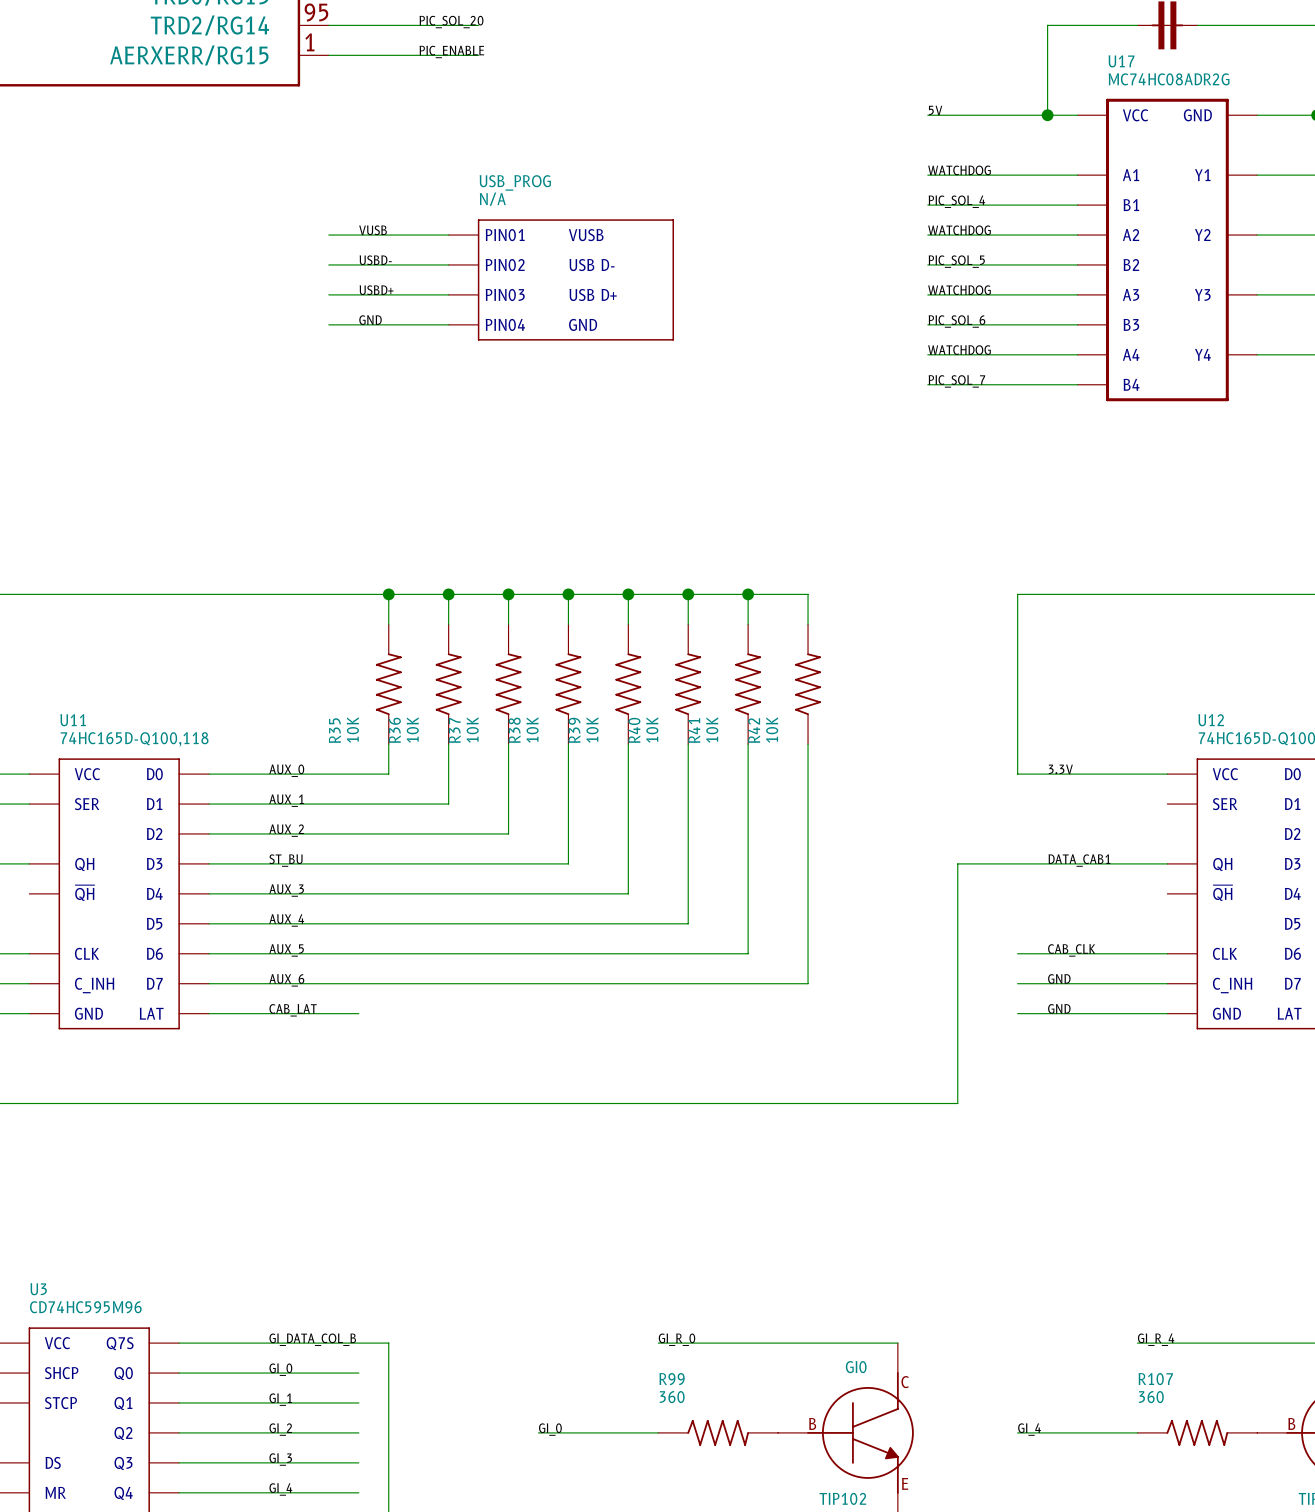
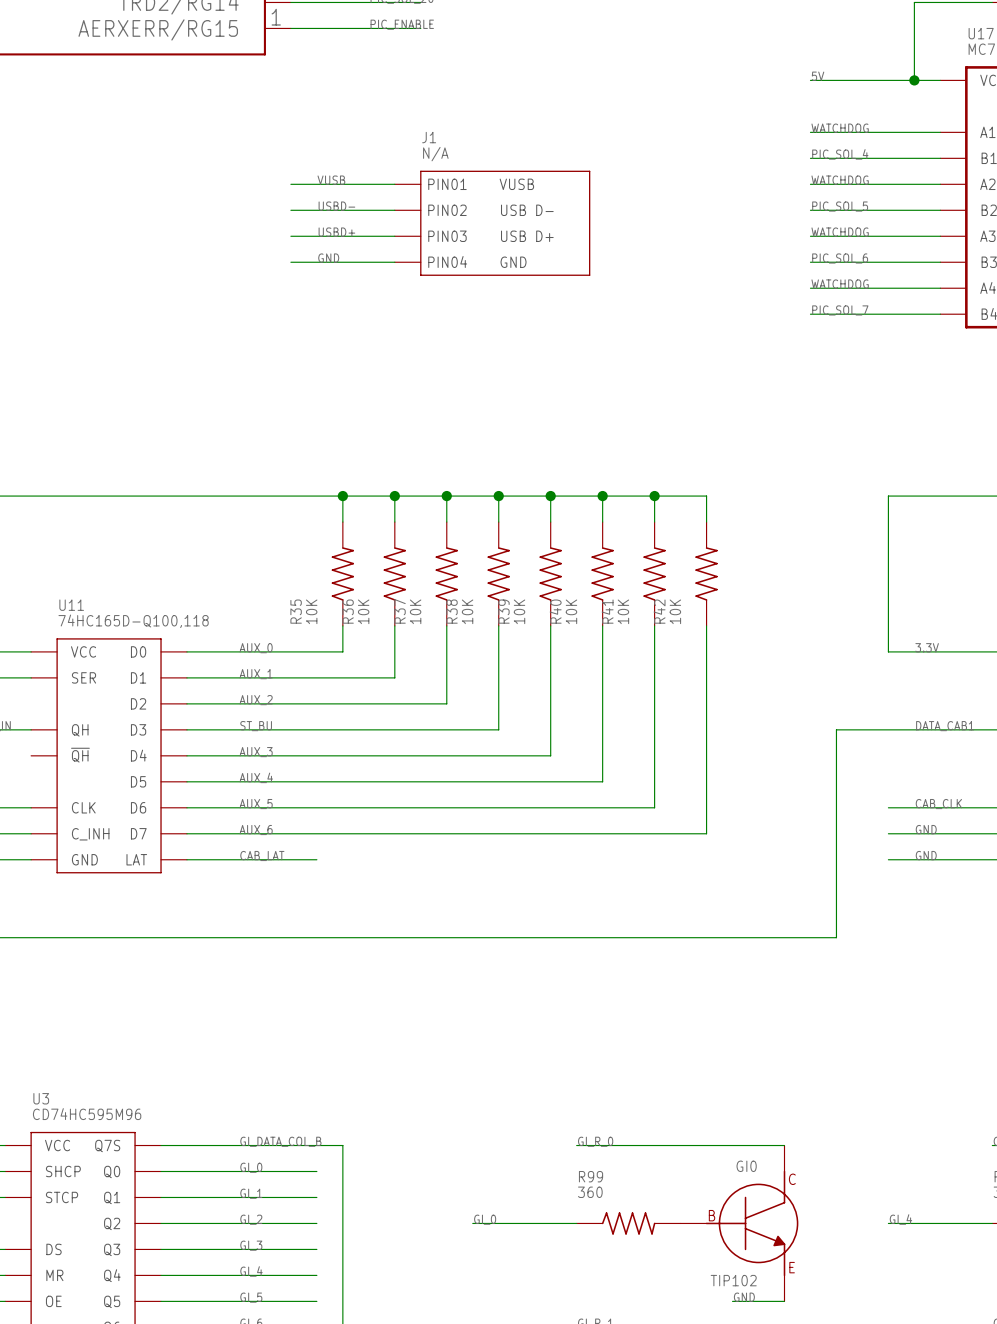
USB_PROG name: USB_PROG (515, 182) -> J1 (429, 137)

